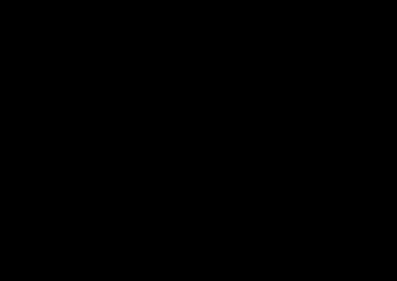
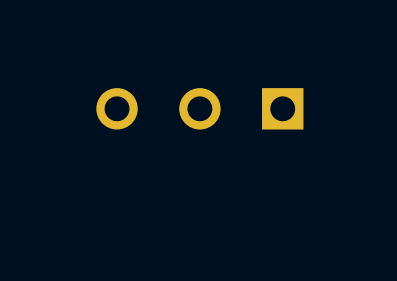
part: none -> (199, 108)

